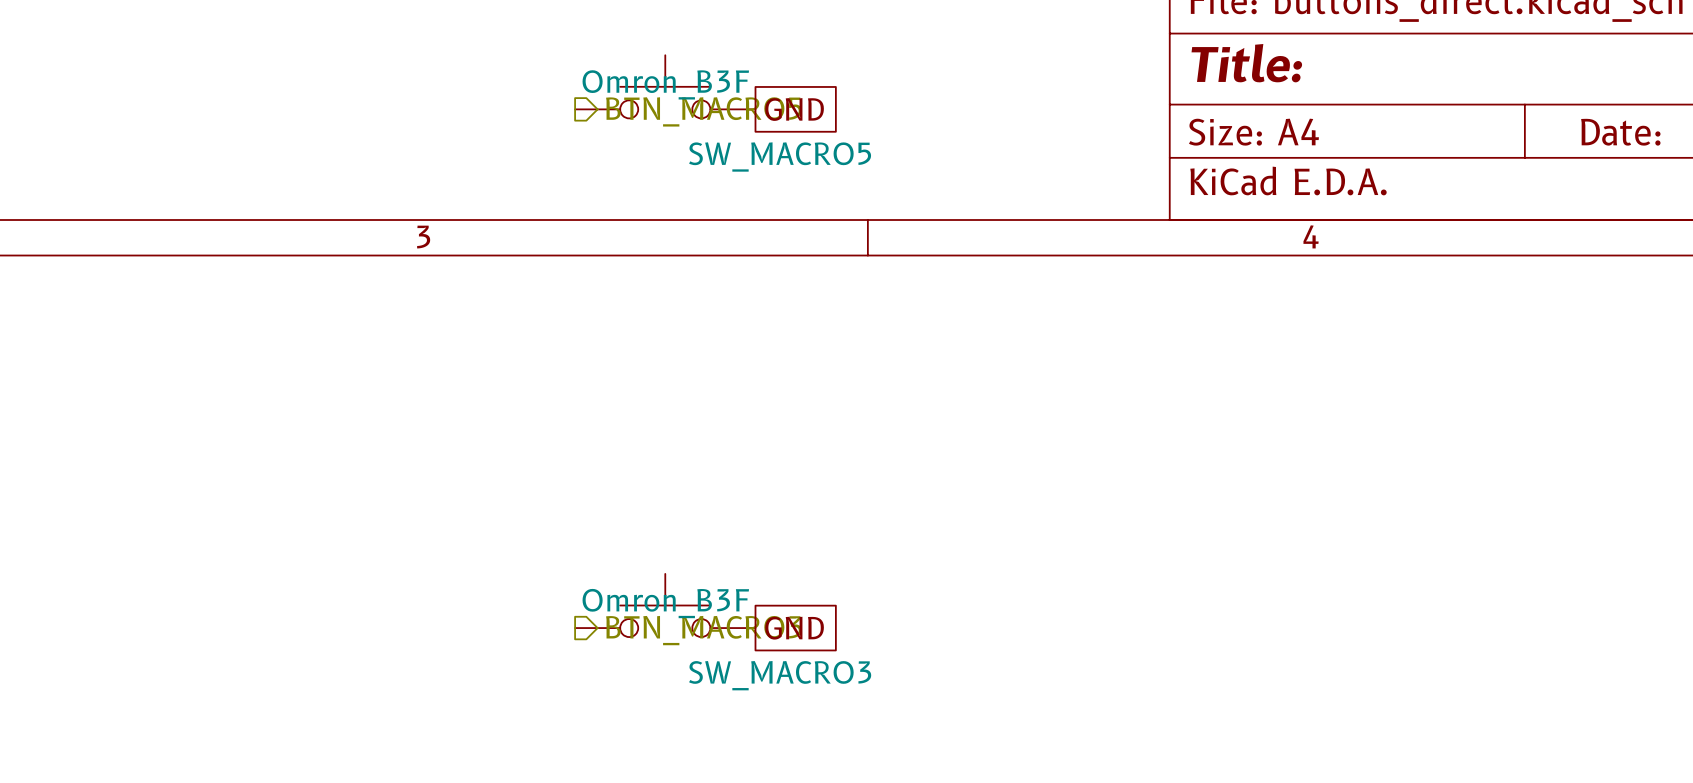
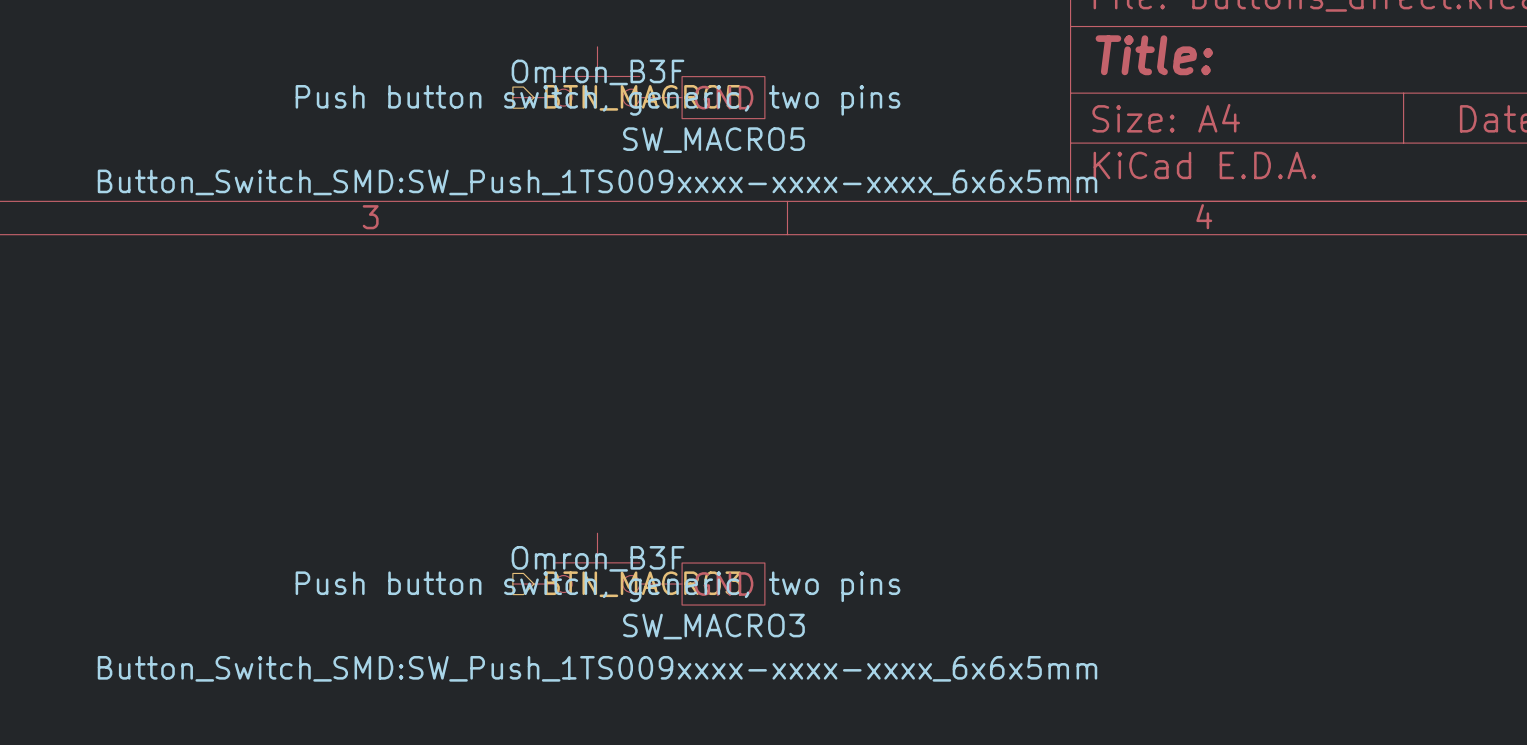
SW_MACRO5 text: none -> Push button switch, generic, two pins (597, 100)
SW_MACRO5 text: none -> Button_Switch_SMD:SW_Push_1TS009xxxx-xxxx-xxxx_6x6x5mm (597, 182)
SW_MACRO3 text: none -> Push button switch, generic, two pins (597, 586)
SW_MACRO3 text: none -> Button_Switch_SMD:SW_Push_1TS009xxxx-xxxx-xxxx_6x6x5mm (597, 668)

